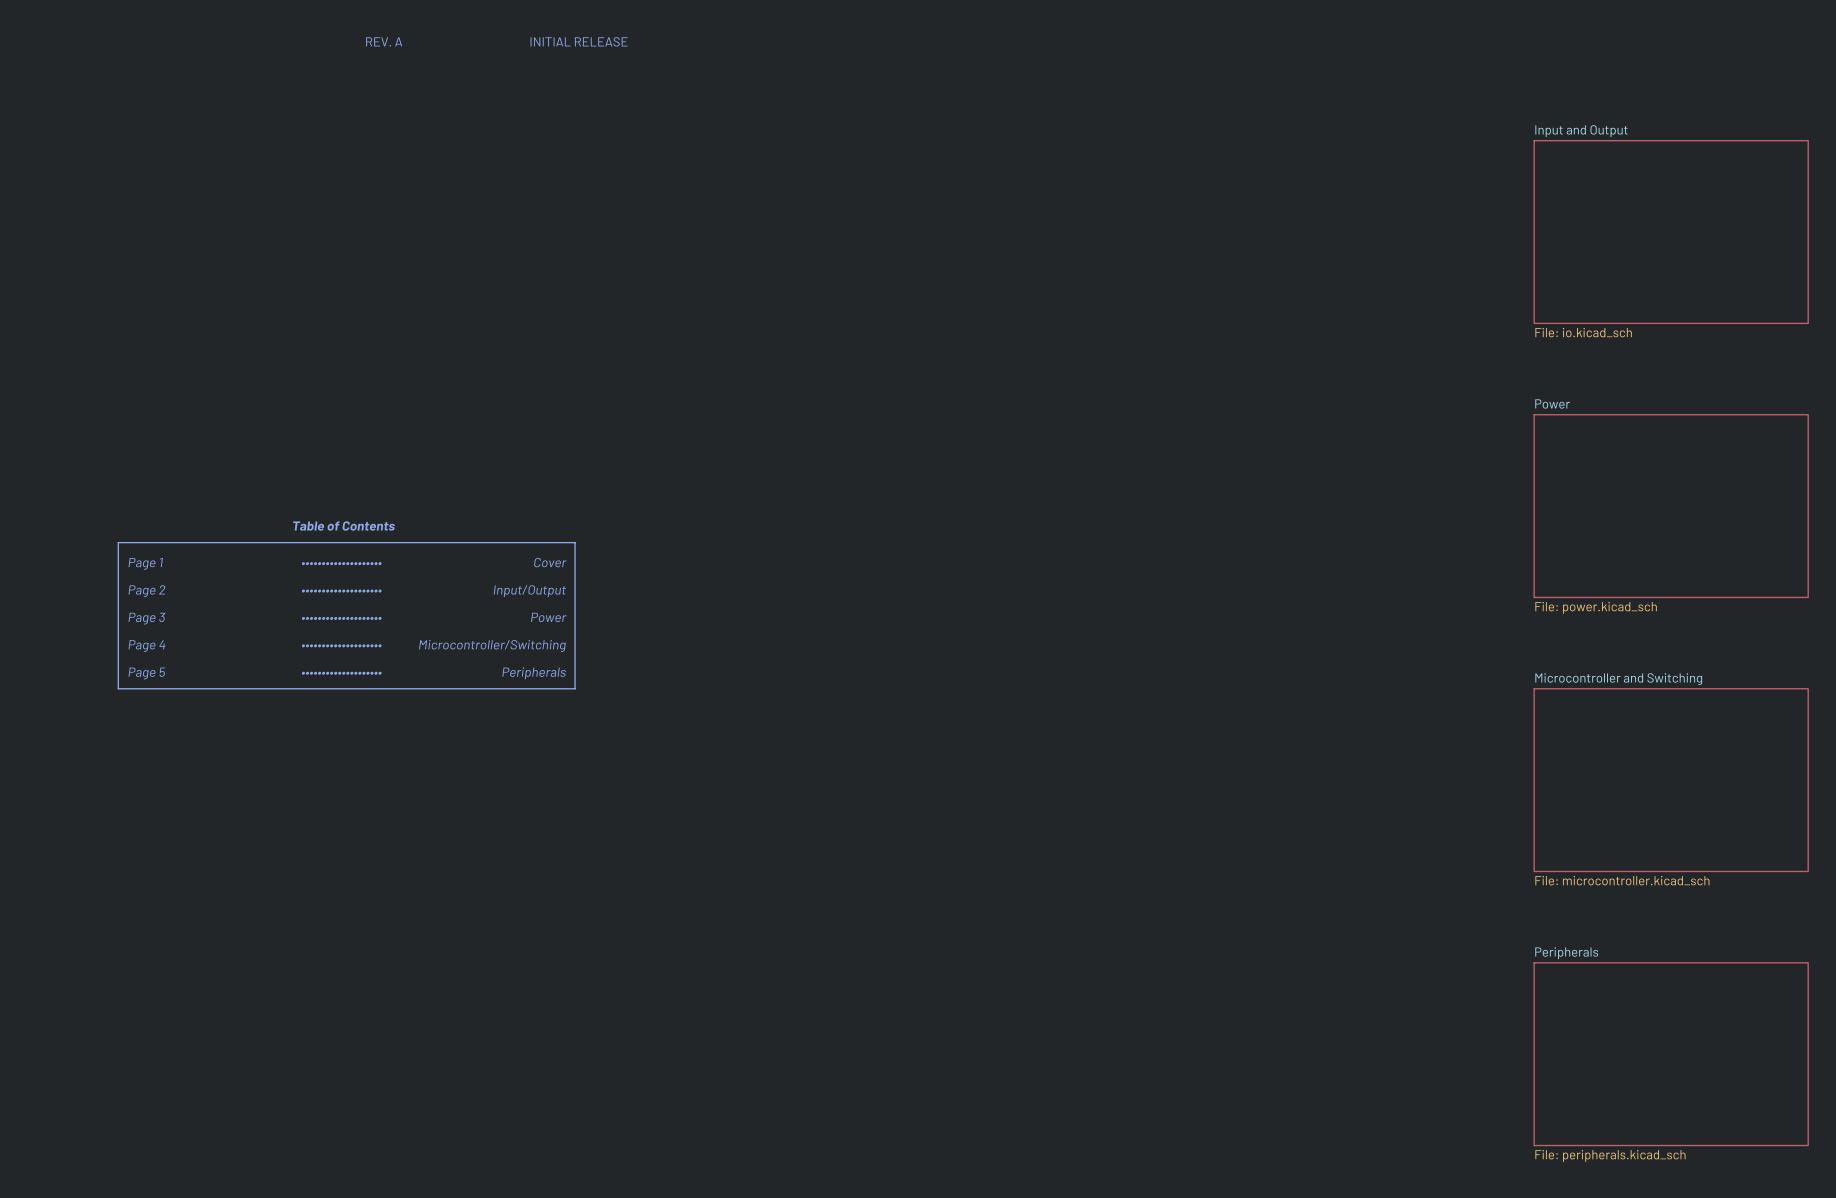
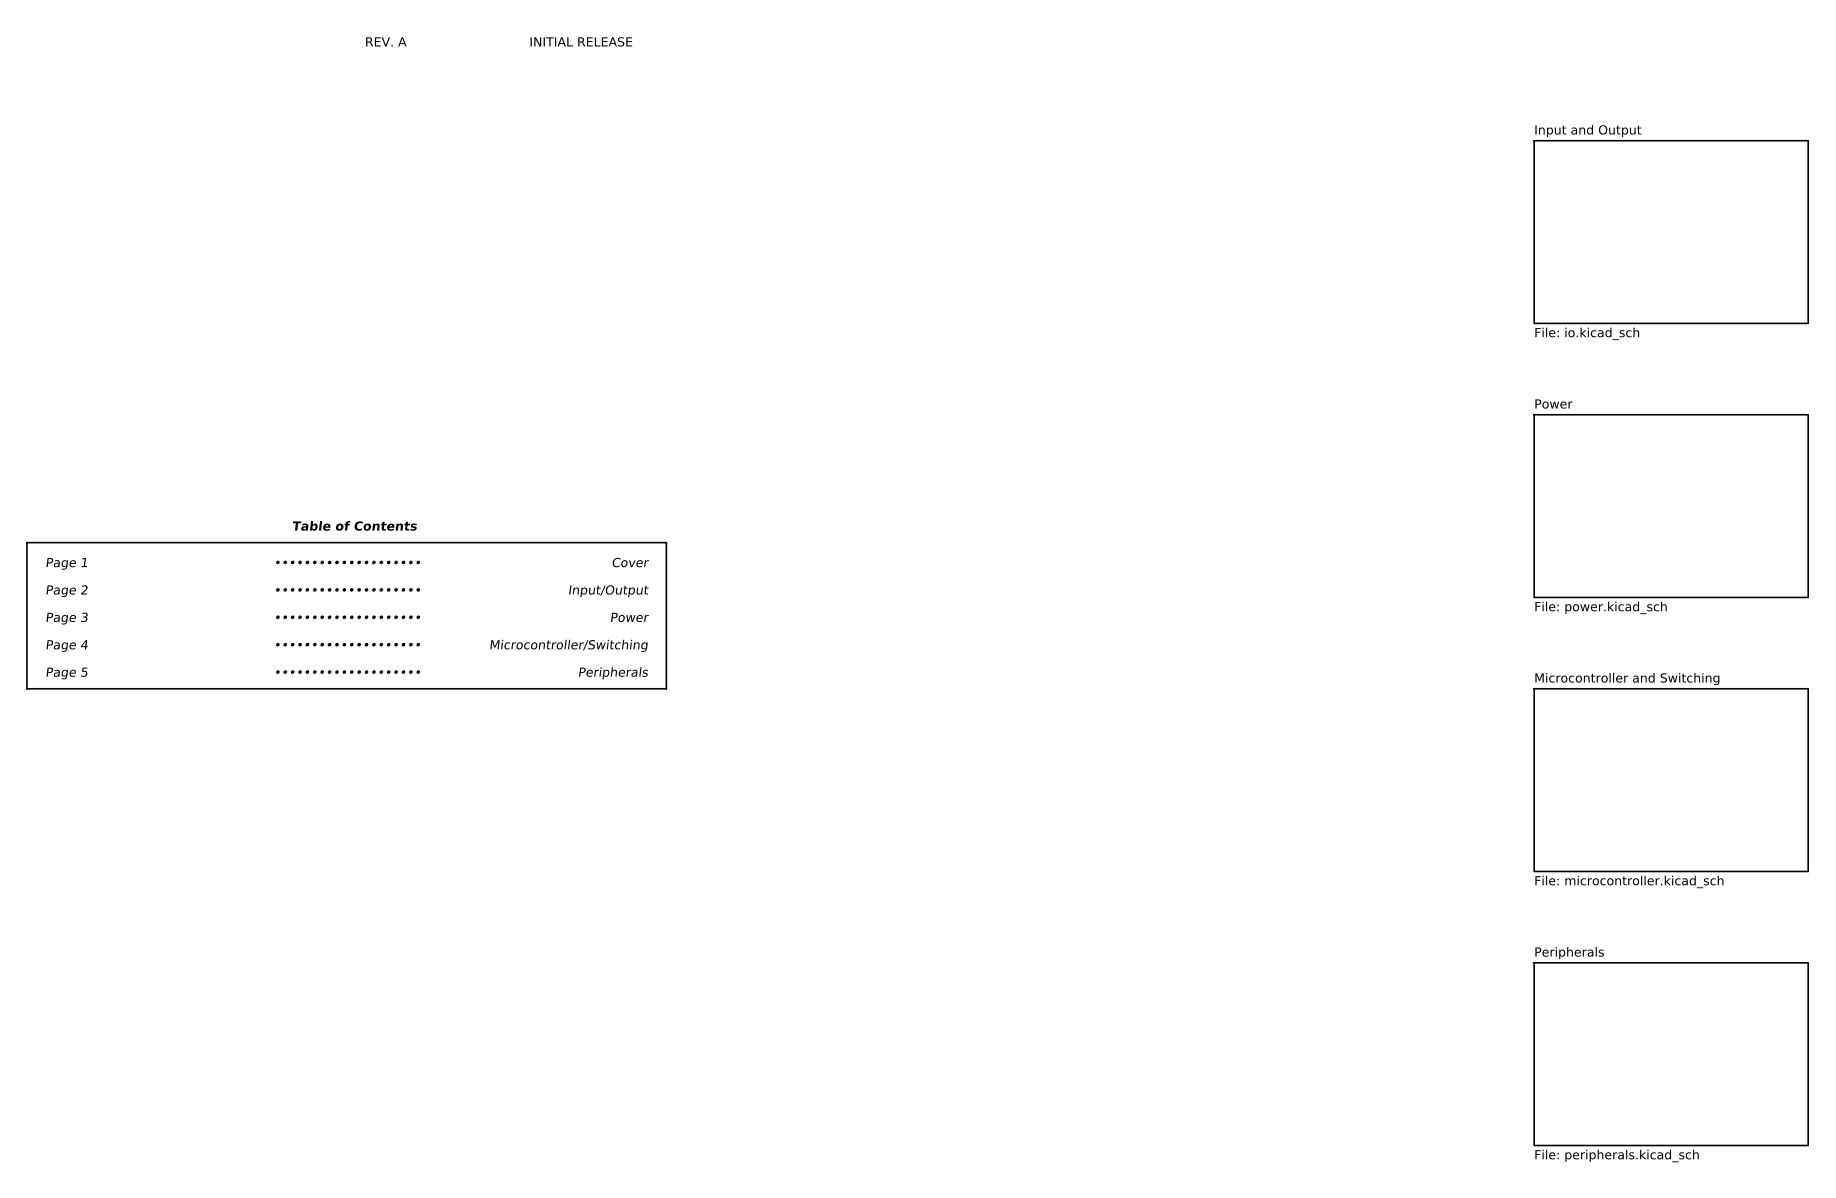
line: (118, 542) (118, 688) -> (118, 542) (26, 542) (26, 688) (118, 688)
line: (575, 542) (575, 688) -> (575, 542) (666, 542) (666, 688) (575, 688)
text position: Cover (550, 562) -> Cover (630, 562)
text position: Page 1 (145, 563) -> Page 1 (66, 563)
text position: •••••••••••••••••••• (341, 563) -> •••••••••••••••••••• (348, 562)
text position: Page 2 (146, 591) -> Page 2 (67, 591)
text position: •••••••••••••••••••• (341, 591) -> •••••••••••••••••••• (348, 589)
text position: Input/Output (529, 591) -> Input/Output (608, 591)
text position: Power (548, 617) -> Power (629, 617)
text position: Page 3 (146, 618) -> Page 3 (67, 618)
text position: •••••••••••••••••••• (341, 618) -> •••••••••••••••••••• (348, 617)
text position: •••••••••••••••••••• (341, 645) -> •••••••••••••••••••• (348, 644)
text position: Microcontroller/Switching (492, 645) -> Microcontroller/Switching (569, 645)
text position: Page 4 (146, 646) -> Page 4 (67, 646)
text position: Page 5 (146, 673) -> Page 5 (66, 673)
text position: •••••••••••••••••••• (341, 673) -> •••••••••••••••••••• (348, 672)
text position: Peripherals (534, 673) -> Peripherals (613, 673)

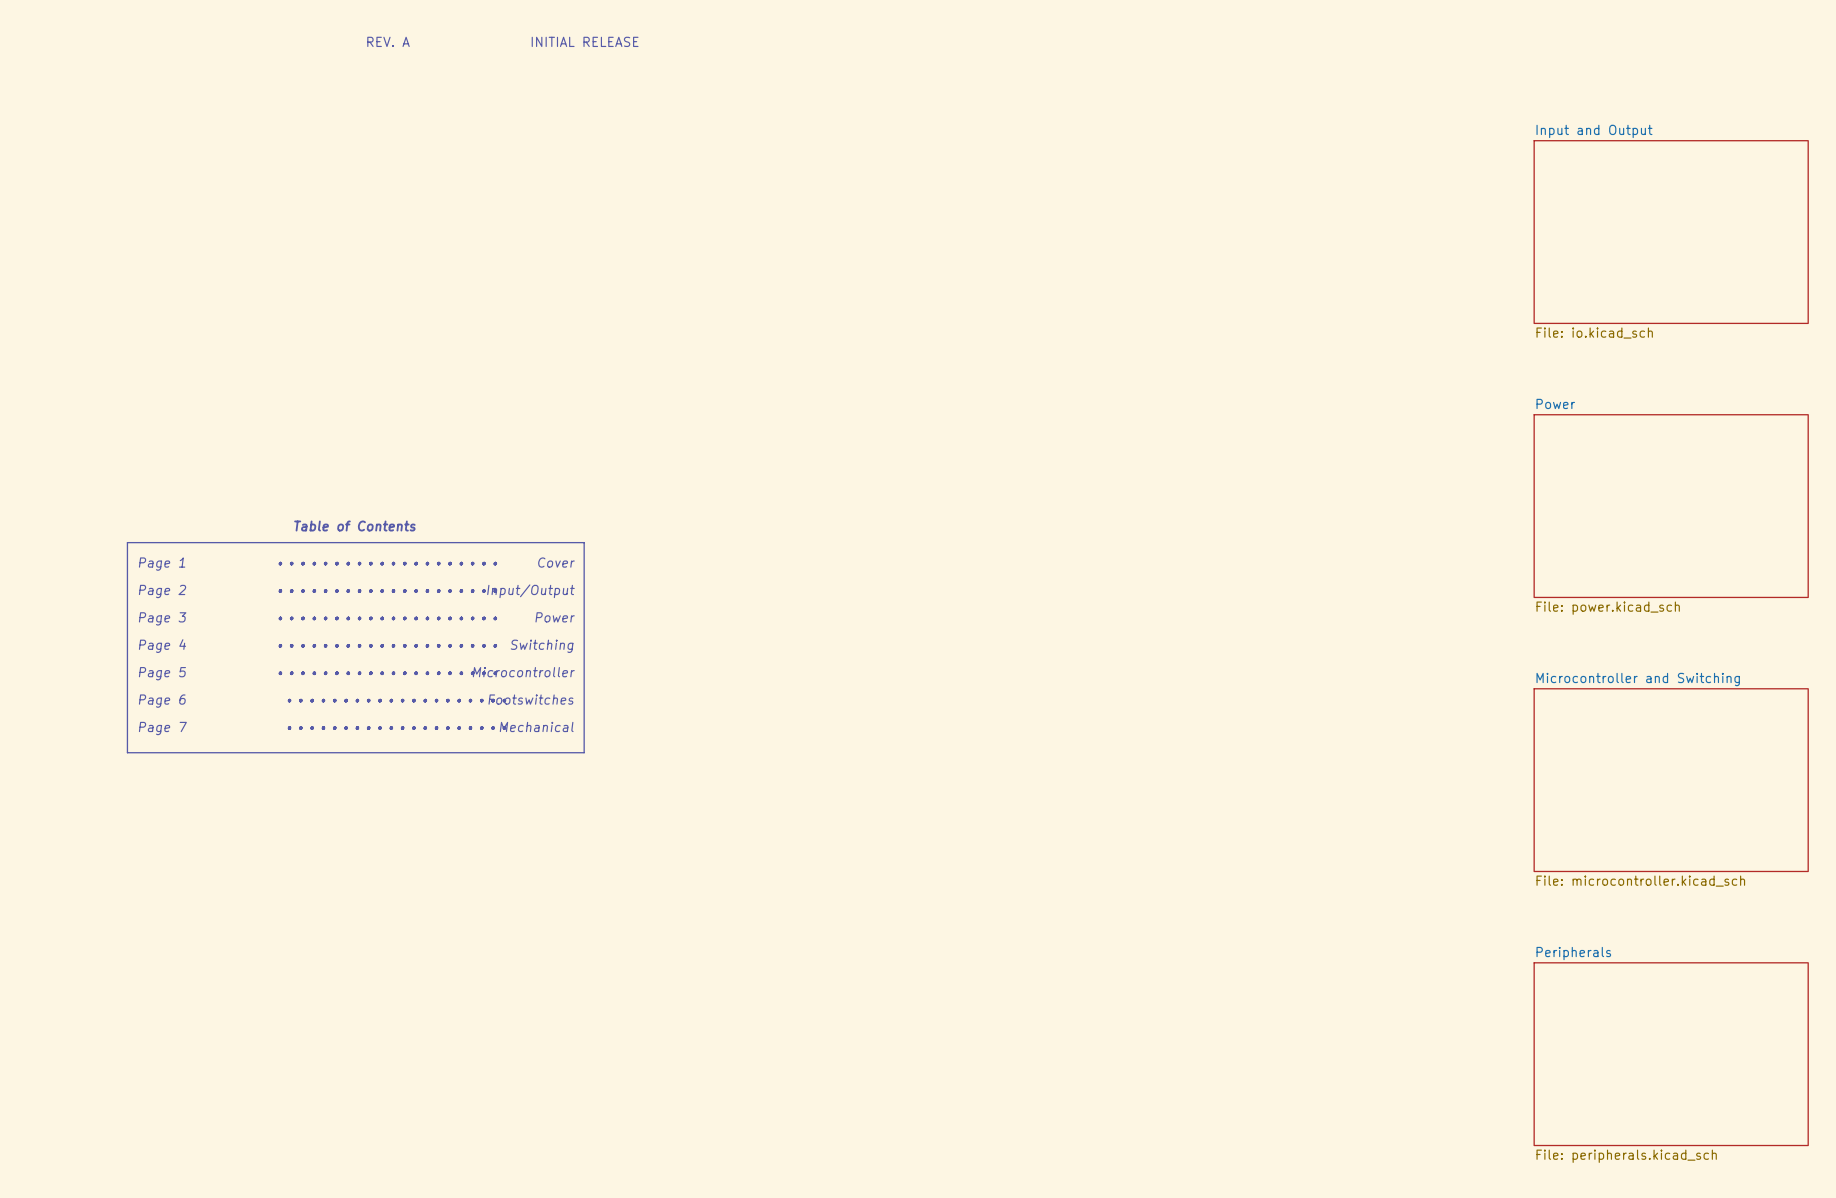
line: (127, 542) (26, 542) (26, 688) (666, 688) (666, 542) (584, 542) -> (127, 542) (127, 752) (584, 752) (584, 542)
text position: Cover (630, 562) -> Cover (556, 562)
text position: Page 1 (66, 563) -> Page 1 (162, 564)
text position: Page 2 (67, 591) -> Page 2 (162, 591)
text position: Input/Output (608, 591) -> Input/Output (530, 591)
text position: Power (629, 617) -> Power (555, 617)
text position: Page 3 (67, 618) -> Page 3 (162, 618)
text: none -> Switching (542, 646)
text: Microcontroller/Switching (569, 645) -> none
text position: Page 4 (67, 646) -> Page 4 (162, 646)
text: none -> Microcontroller (523, 672)
text position: Page 5 (66, 673) -> Page 5 (162, 673)
text: Peripherals (613, 673) -> none
text: none -> •••••••••••••••••••• (396, 700)
text: none -> Footswitches (530, 699)
text: none -> Page 6 (162, 701)
text: none -> •••••••••••••••••••• (396, 728)
text: none -> Mechanical (536, 726)
text: none -> Page 7 (162, 728)

